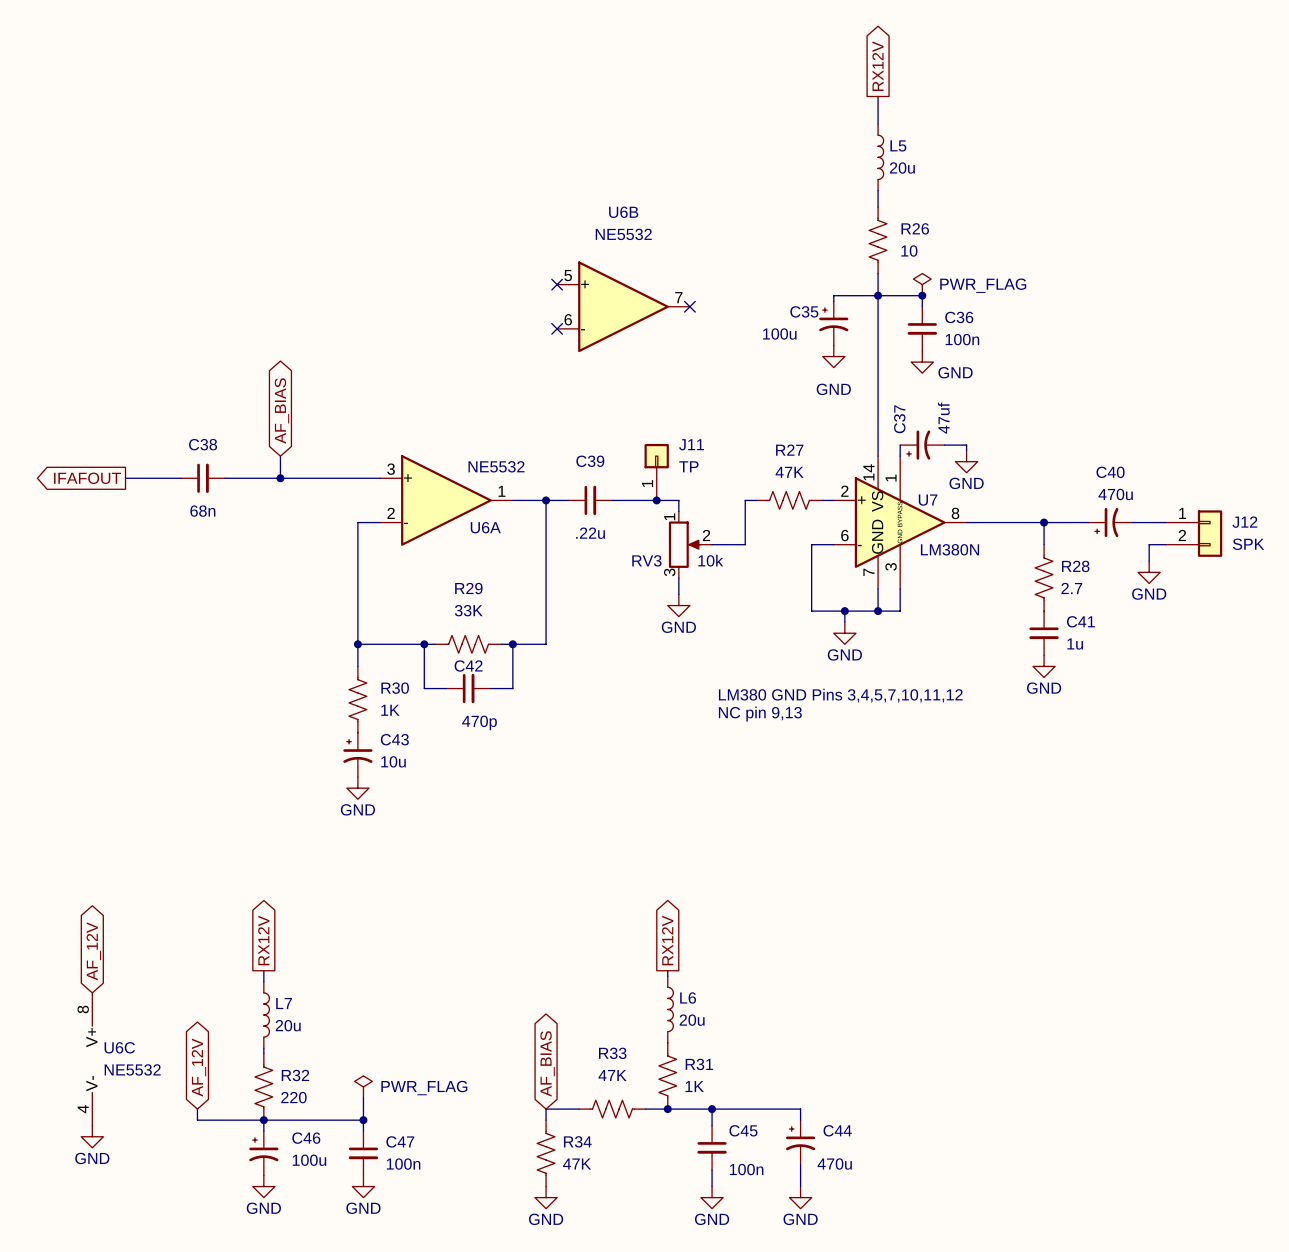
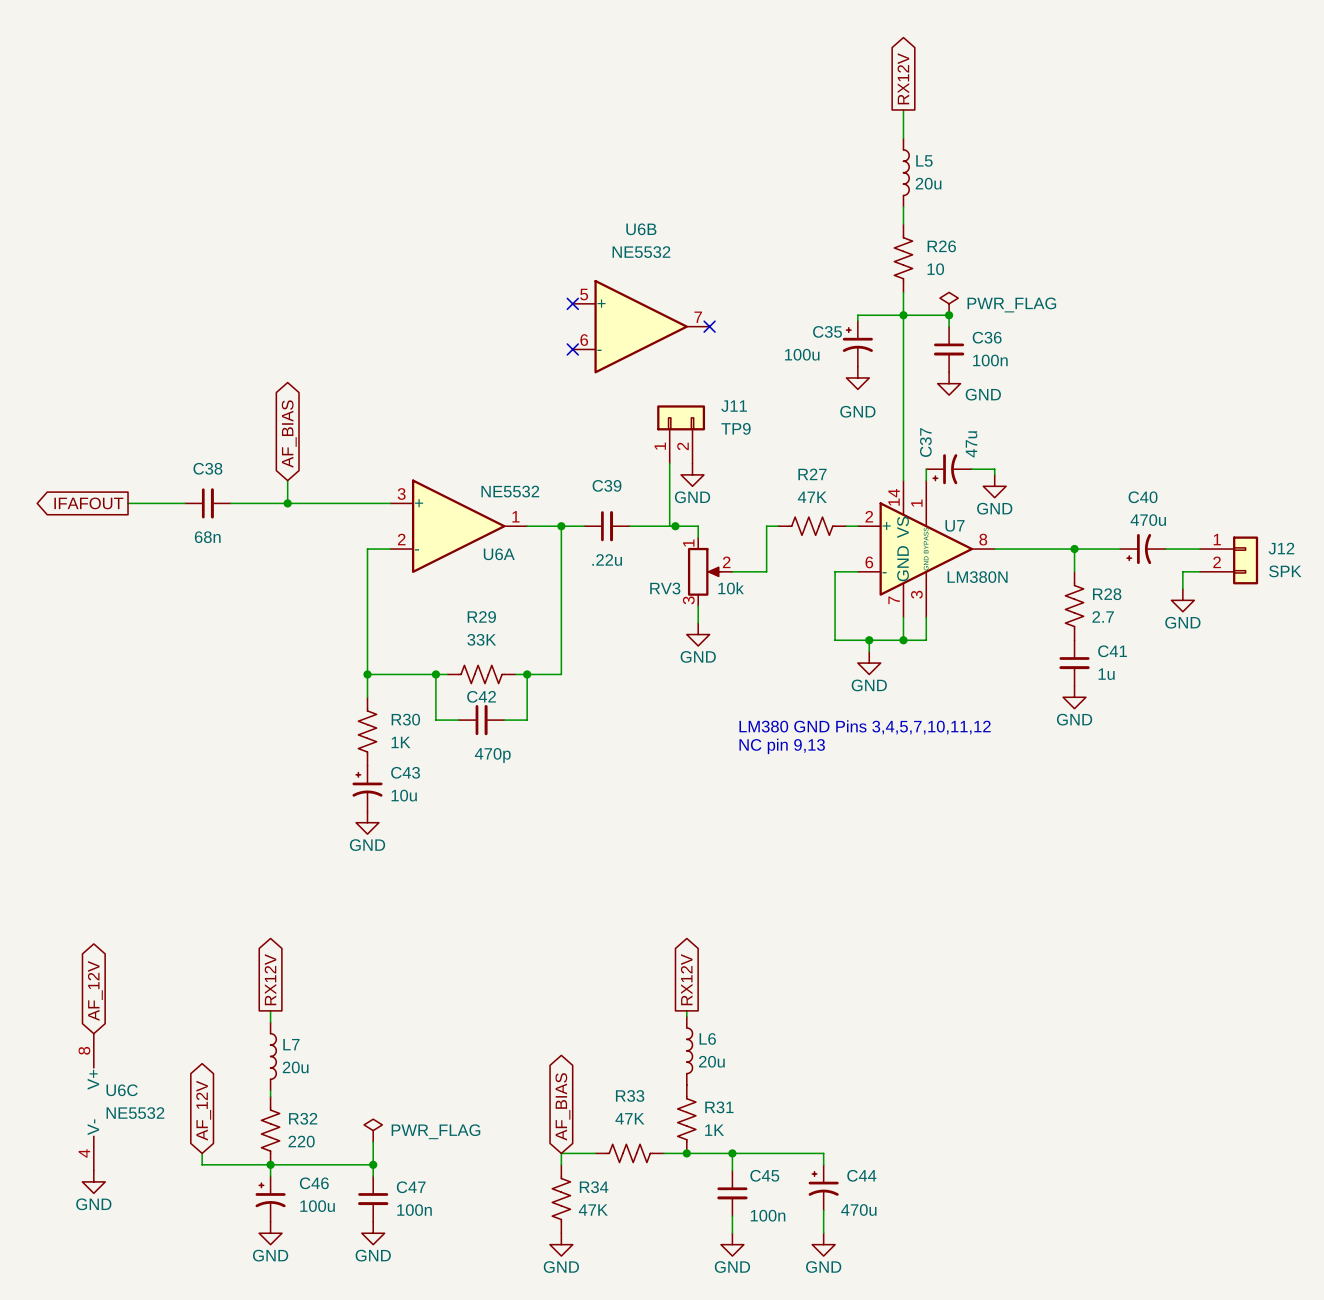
C37 value: 47uf (943, 418) -> 47u (971, 444)
wire: none -> (669, 463) (669, 526)
J11 symbol: [644, 443, 669, 501] -> [657, 405, 706, 464]
power symbol: none -> GND (692, 474)
J11 value: TP (688, 466) -> TP9 (736, 428)

